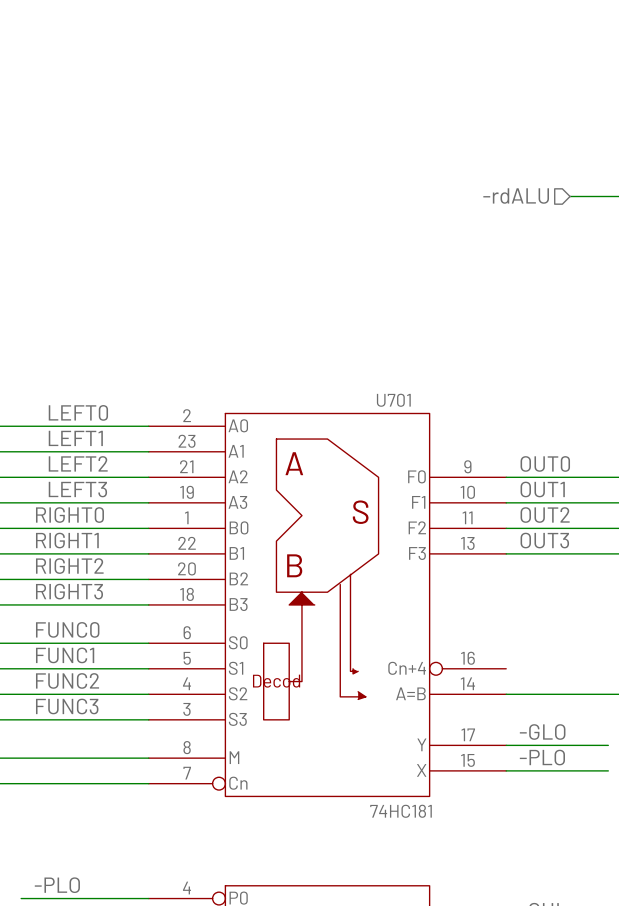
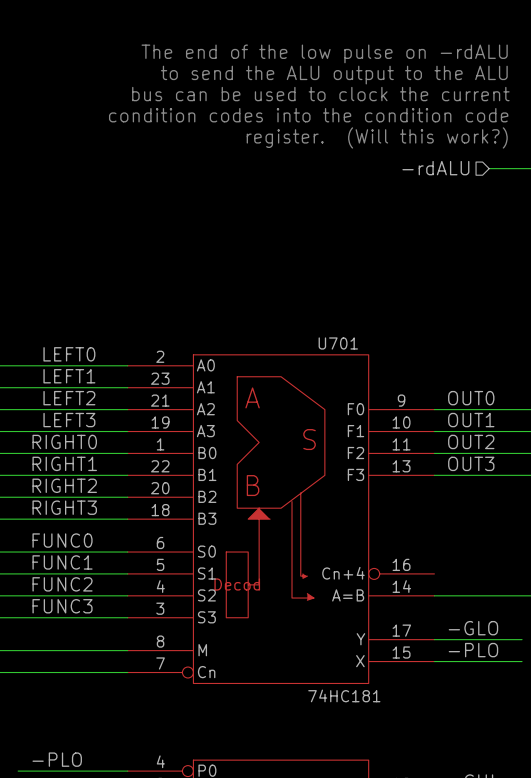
text: none -> The end of the low pulse on -rdALU (324, 53)
text: none -> to send the ALU output to the ALU (334, 75)
text: none -> bus can be used to clock the current (320, 94)
text: none -> condition codes into the condition code (308, 115)
text: none -> register. (Will this work?) (377, 137)

